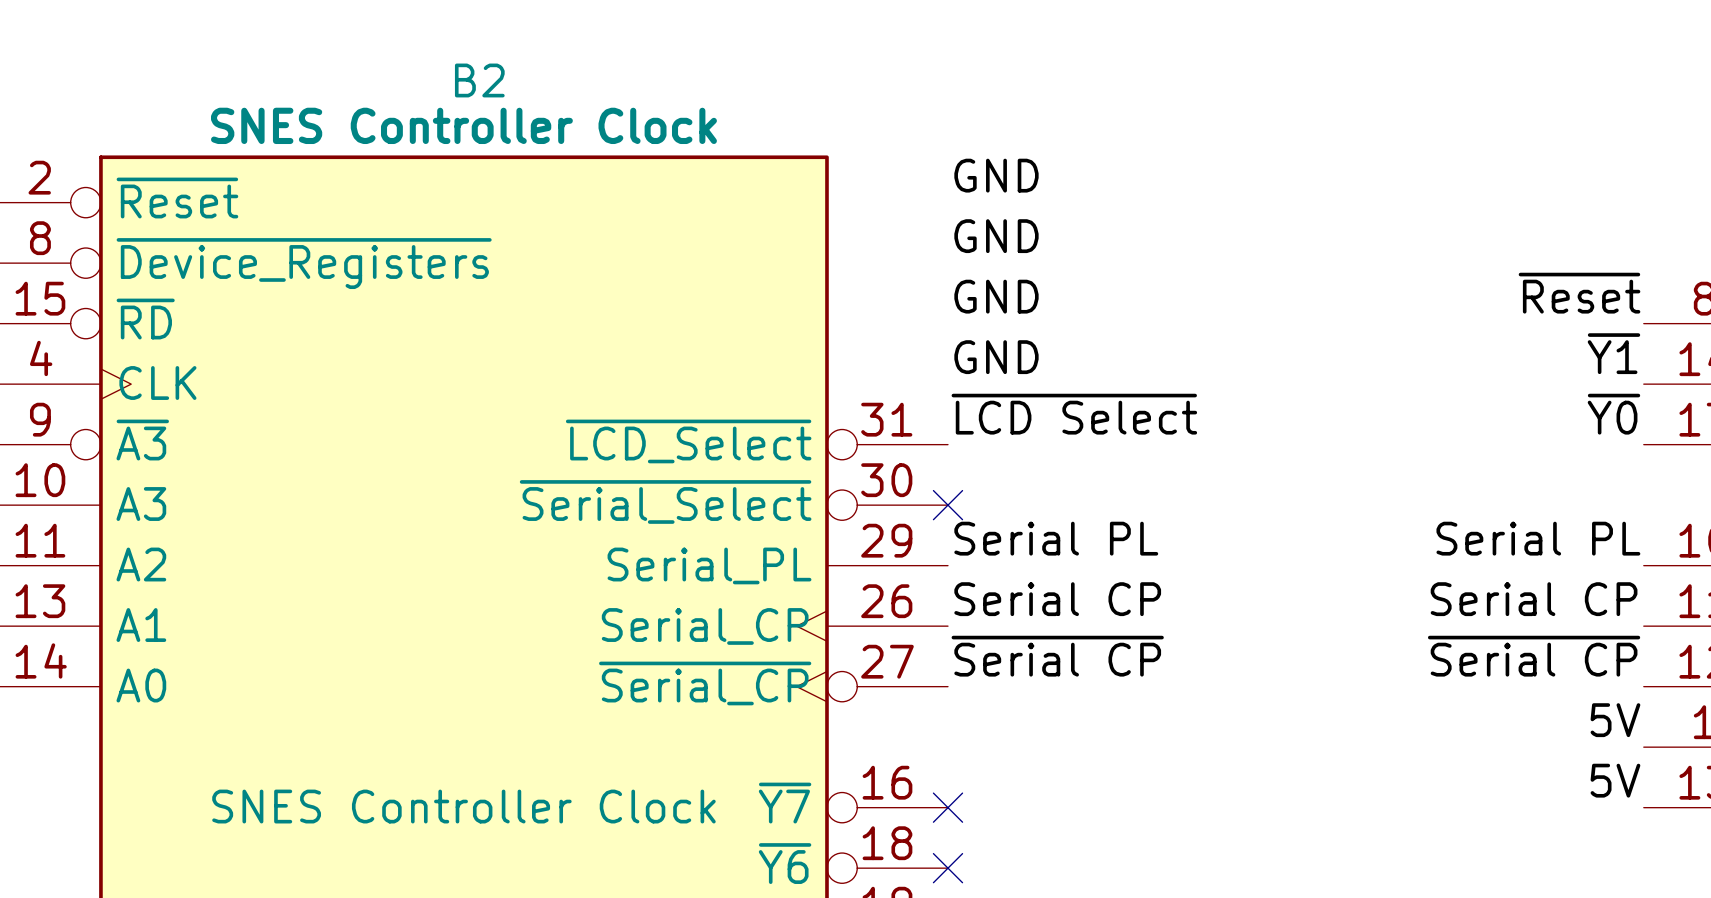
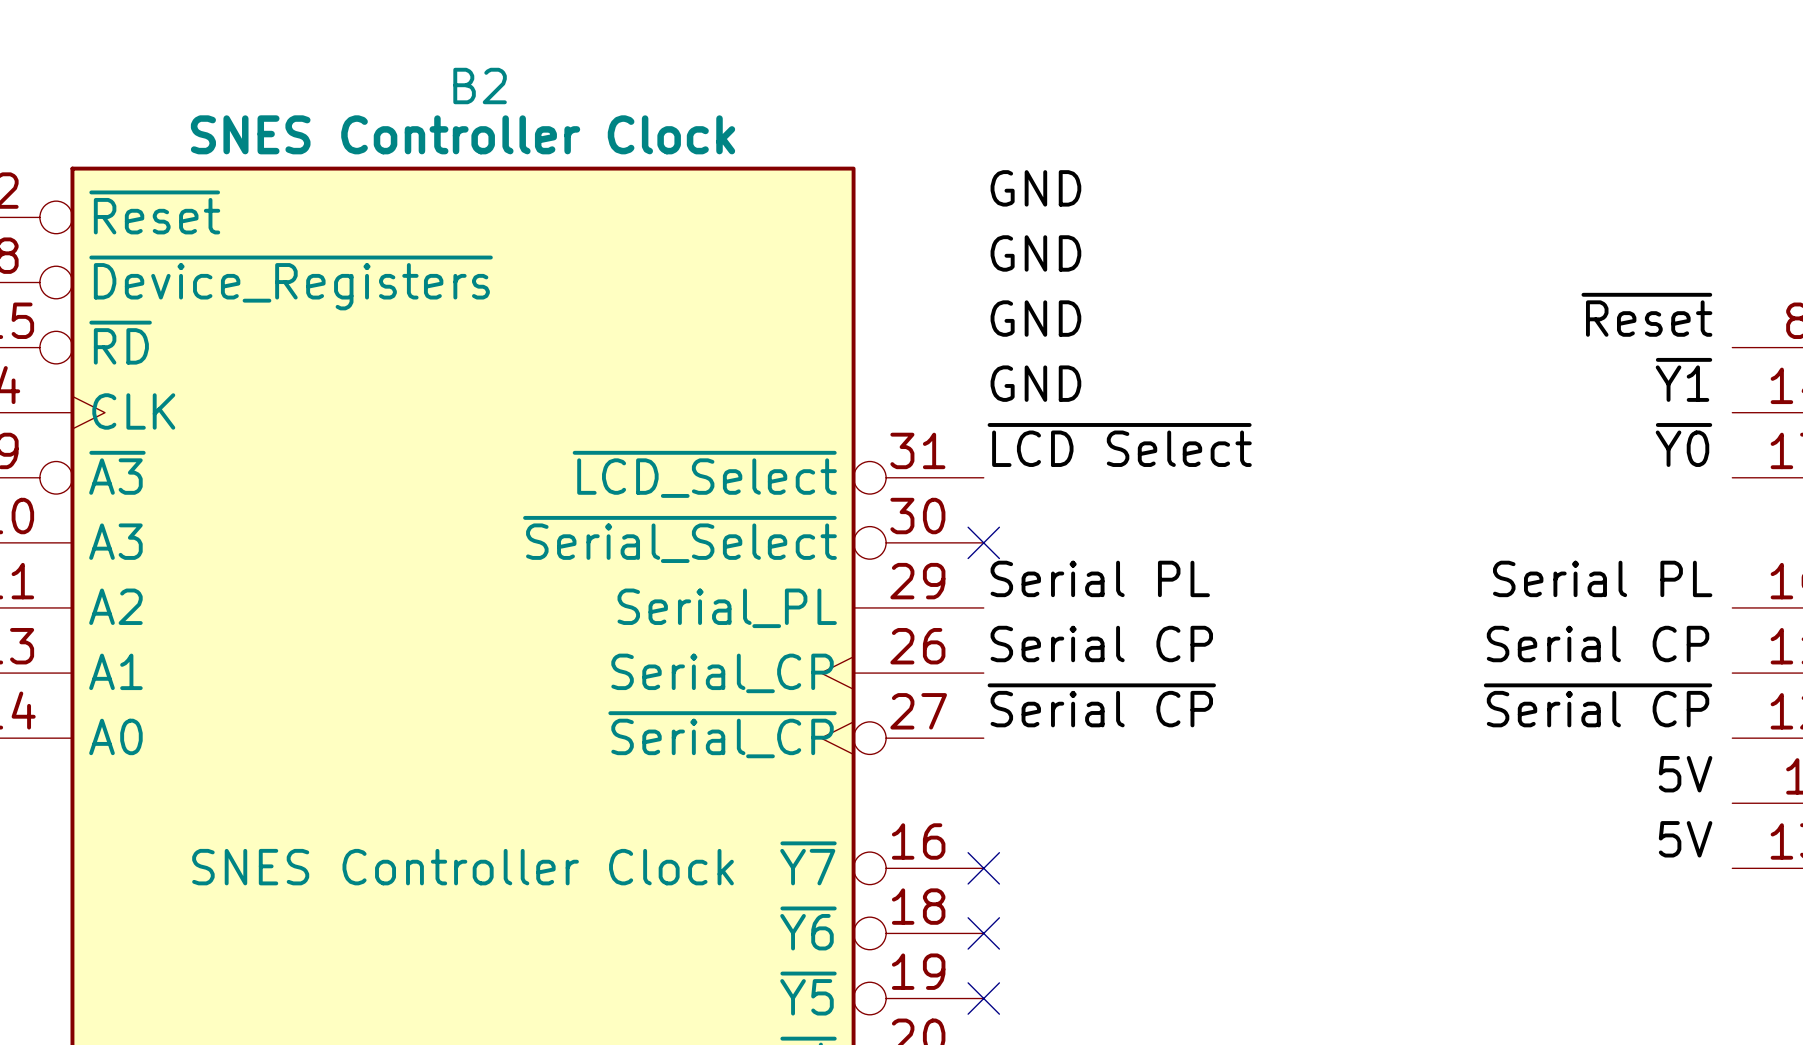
label position: ~{Reset} (1579, 293) -> ~{Reset} (1646, 314)
label position: ~{Y1} (1613, 353) -> ~{Y1} (1683, 379)
label position: ~{Y0} (1613, 414) -> ~{Y0} (1683, 445)
label position: Serial PL (1538, 538) -> Serial PL (1602, 578)
label position: Serial CP (1534, 599) -> Serial CP (1598, 644)
label position: ~{Serial CP} (1534, 656) -> ~{Serial CP} (1598, 705)
label position: 5V (1615, 720) -> 5V (1685, 774)
label position: 5V (1615, 780) -> 5V (1685, 839)

